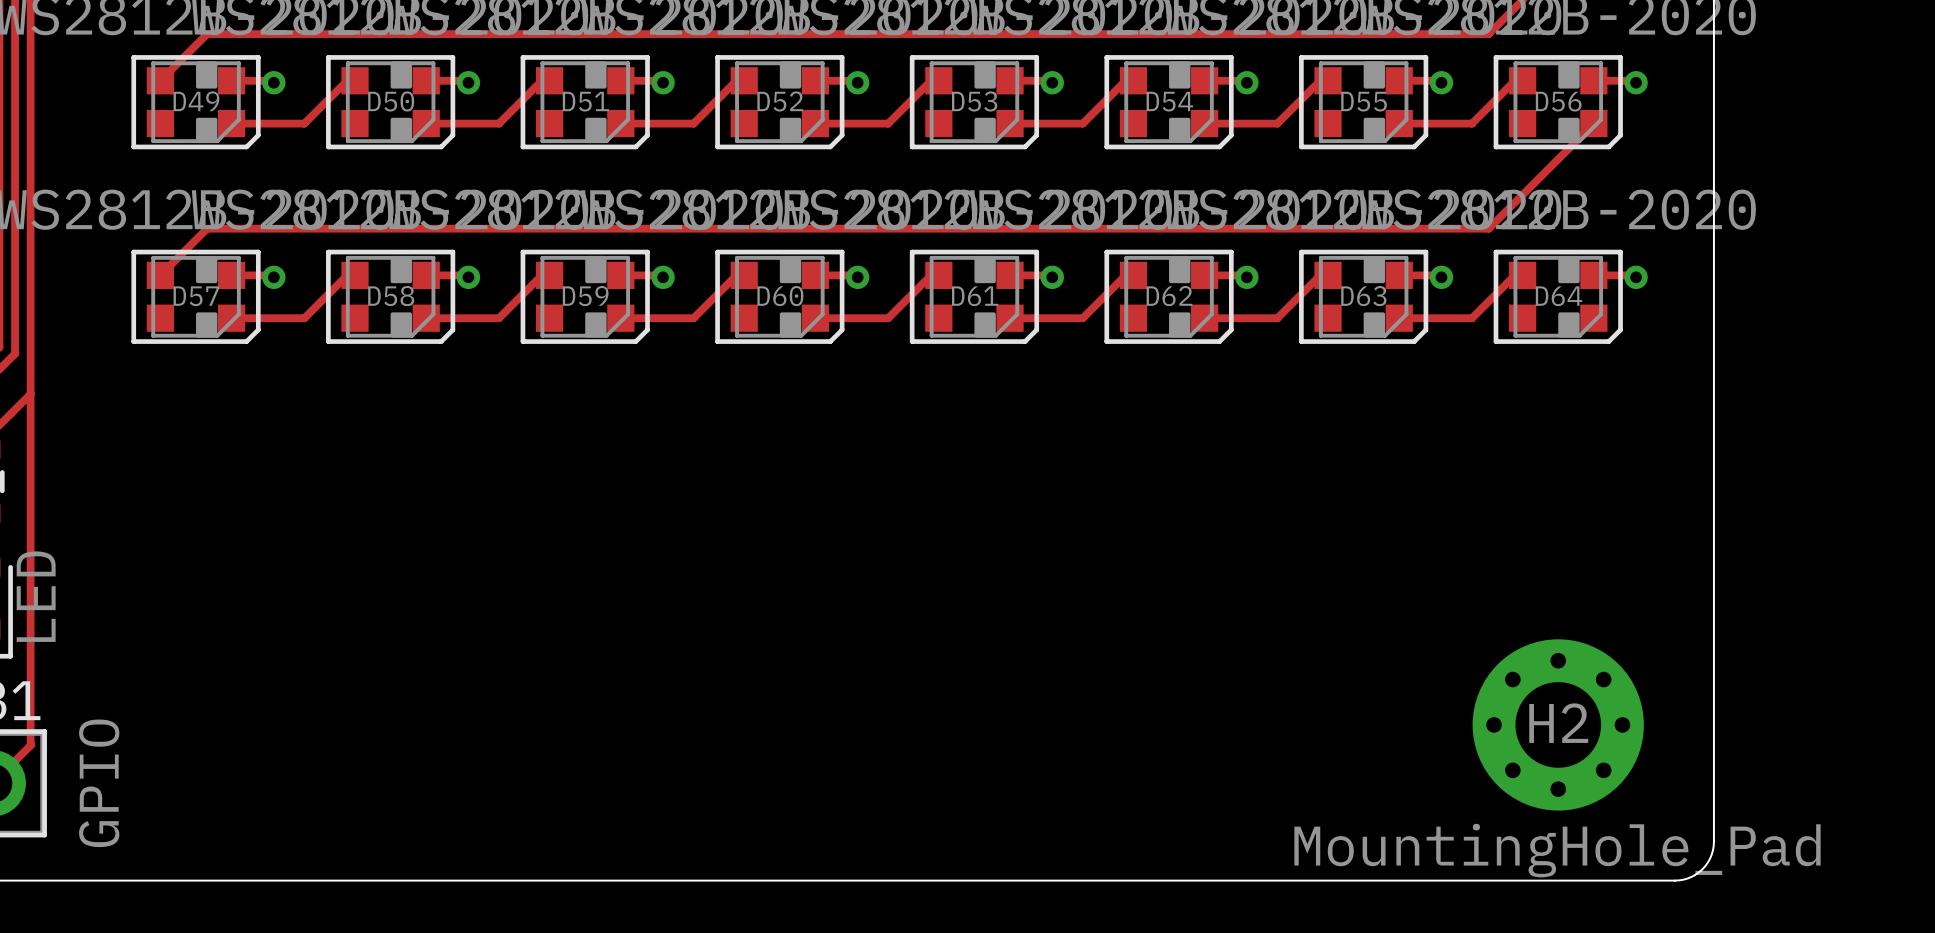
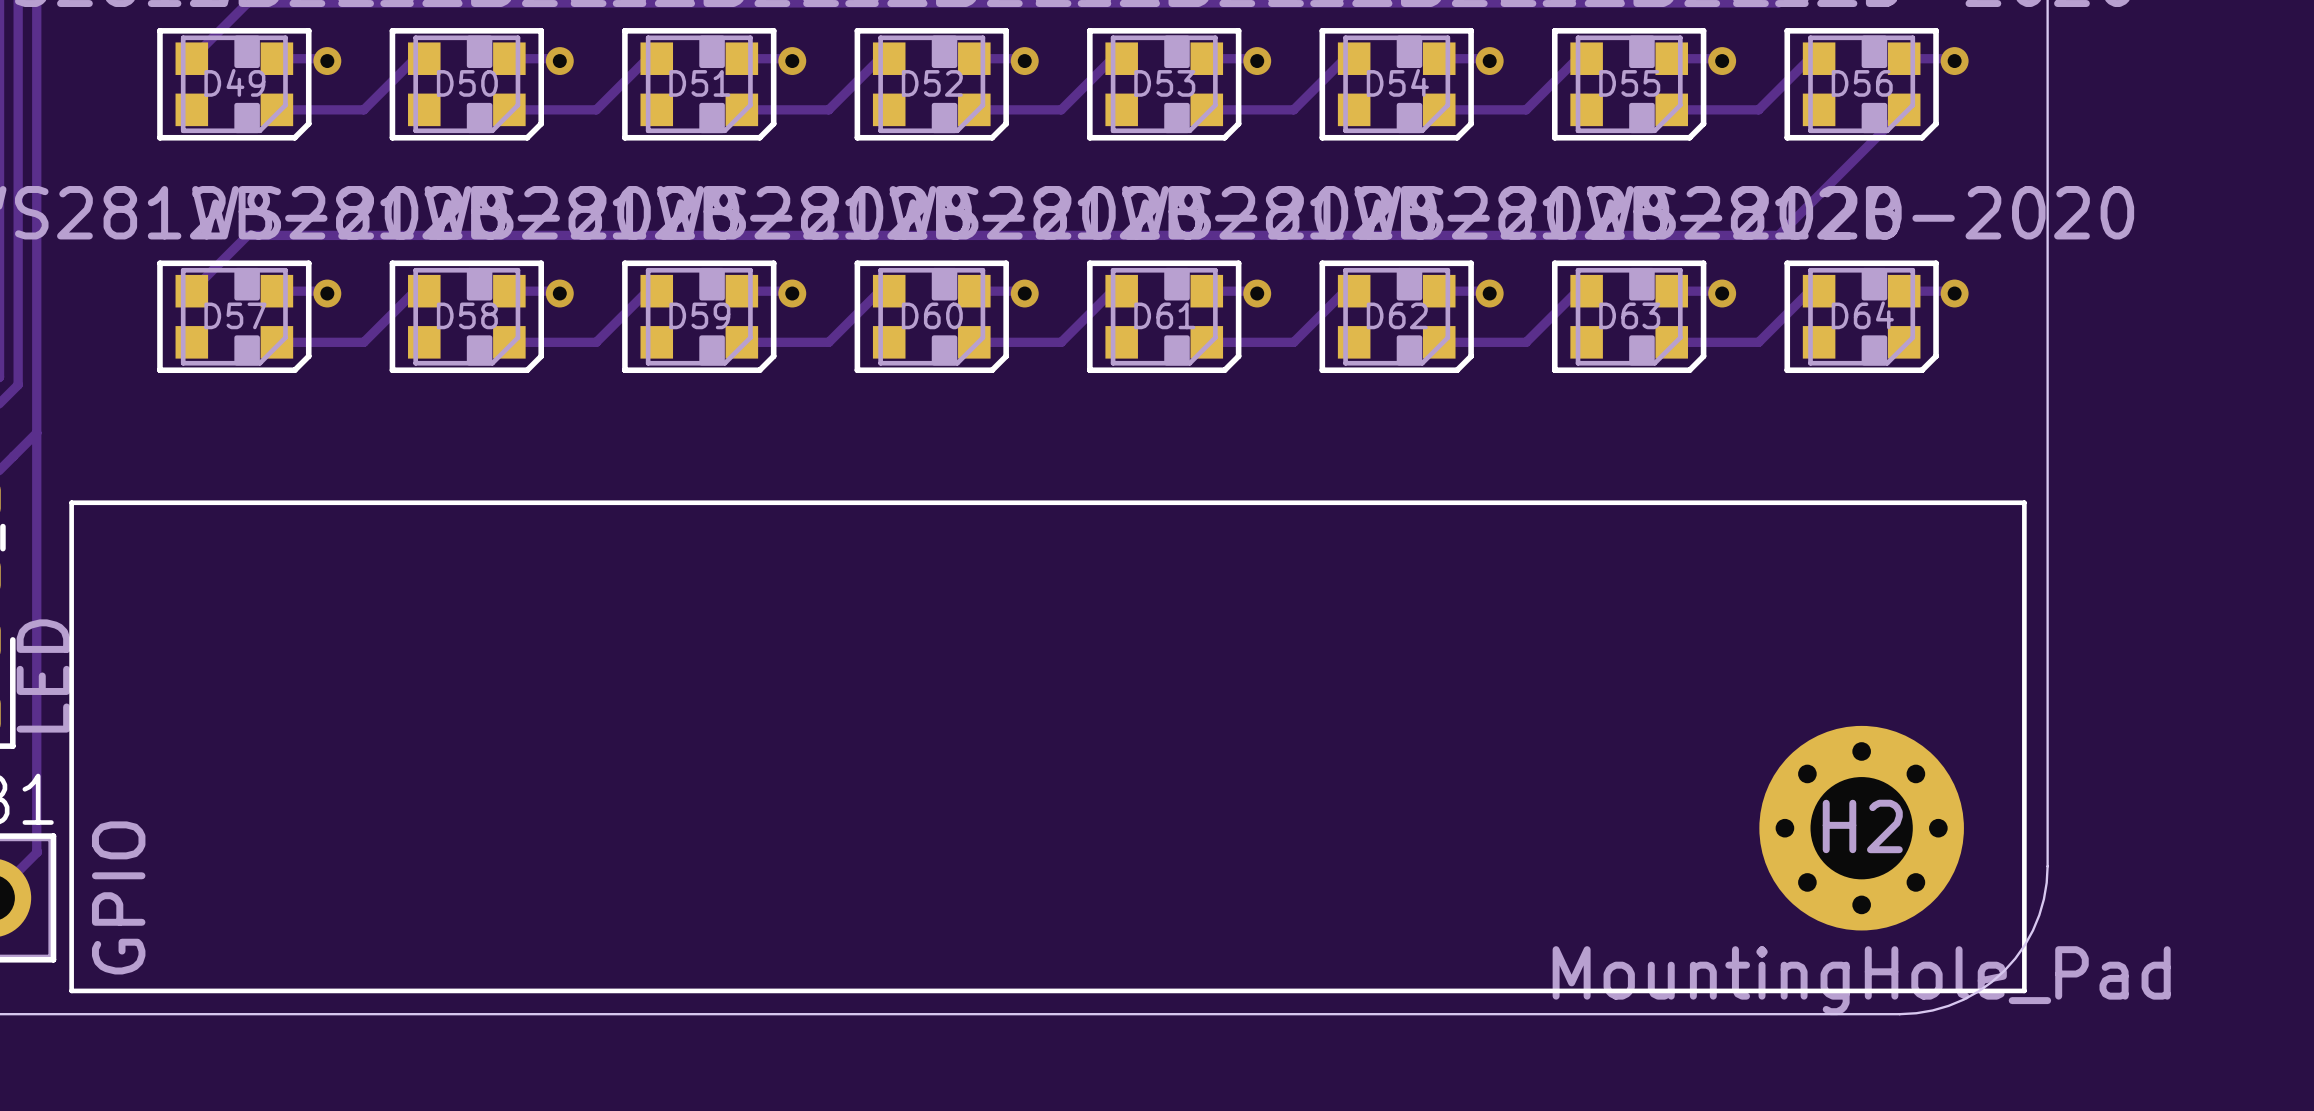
line: none -> (71, 502) (2024, 502) (2024, 990) (71, 990) (71, 502)
board edge: (1713, 756) (1713, 846) (1710, 858) (1702, 869) (1691, 876) (1679, 880) (1590, 880) -> (2047, 866) (2043, 899) (2032, 930) (2015, 958) (2004, 970) (1978, 991) (1948, 1005) (1916, 1013) (1899, 1014)

